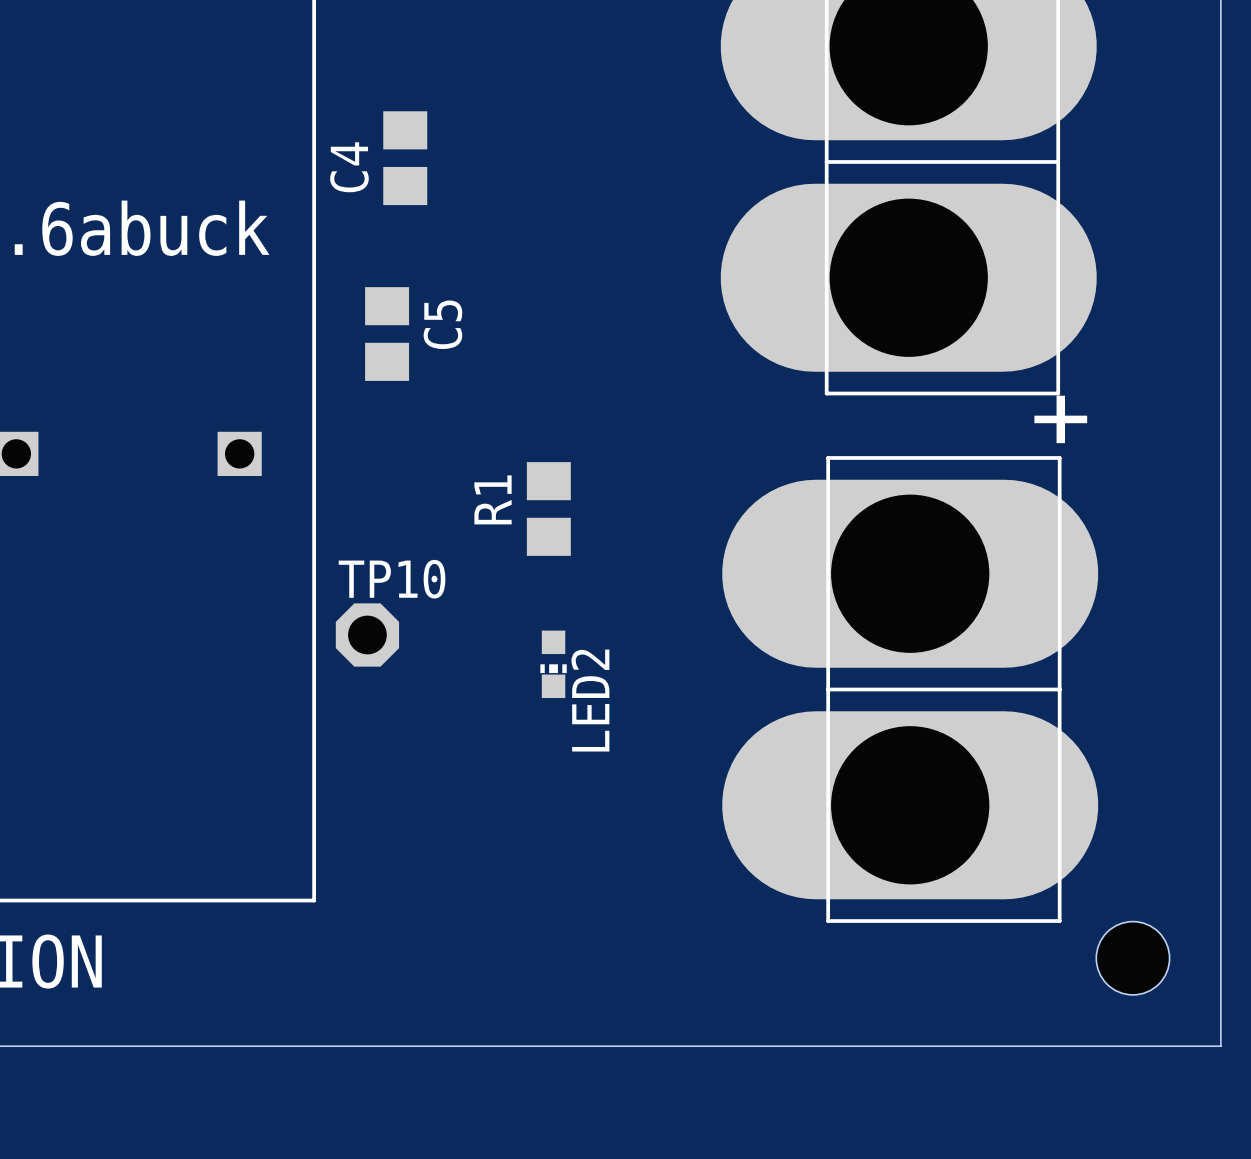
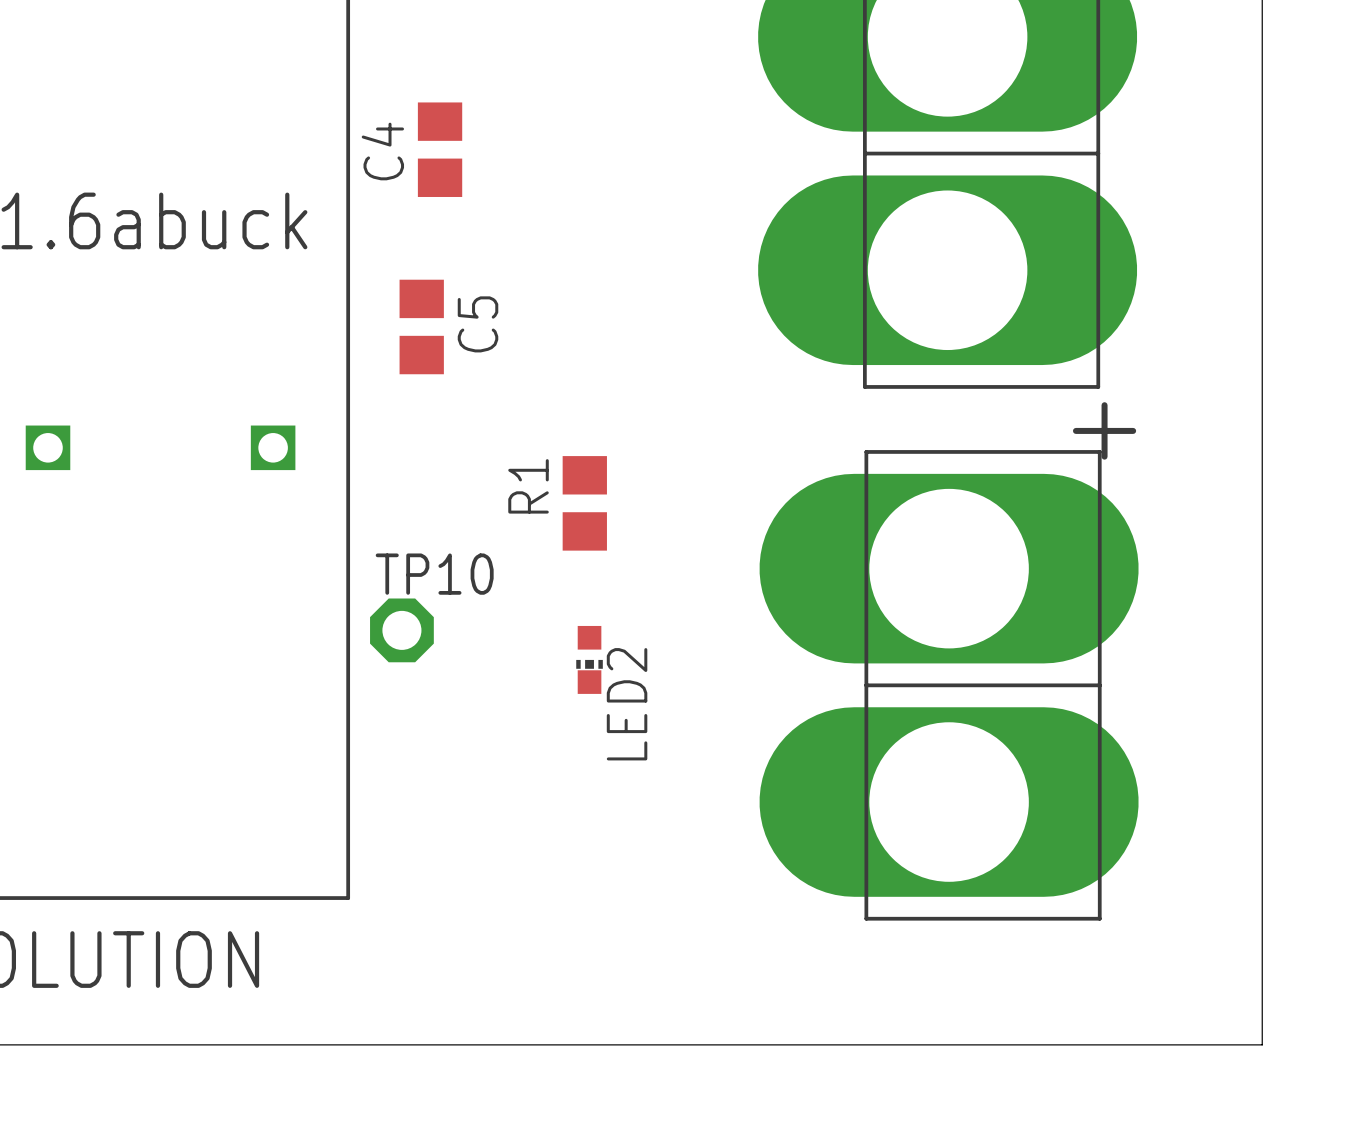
hole: (1132, 958) -> none

